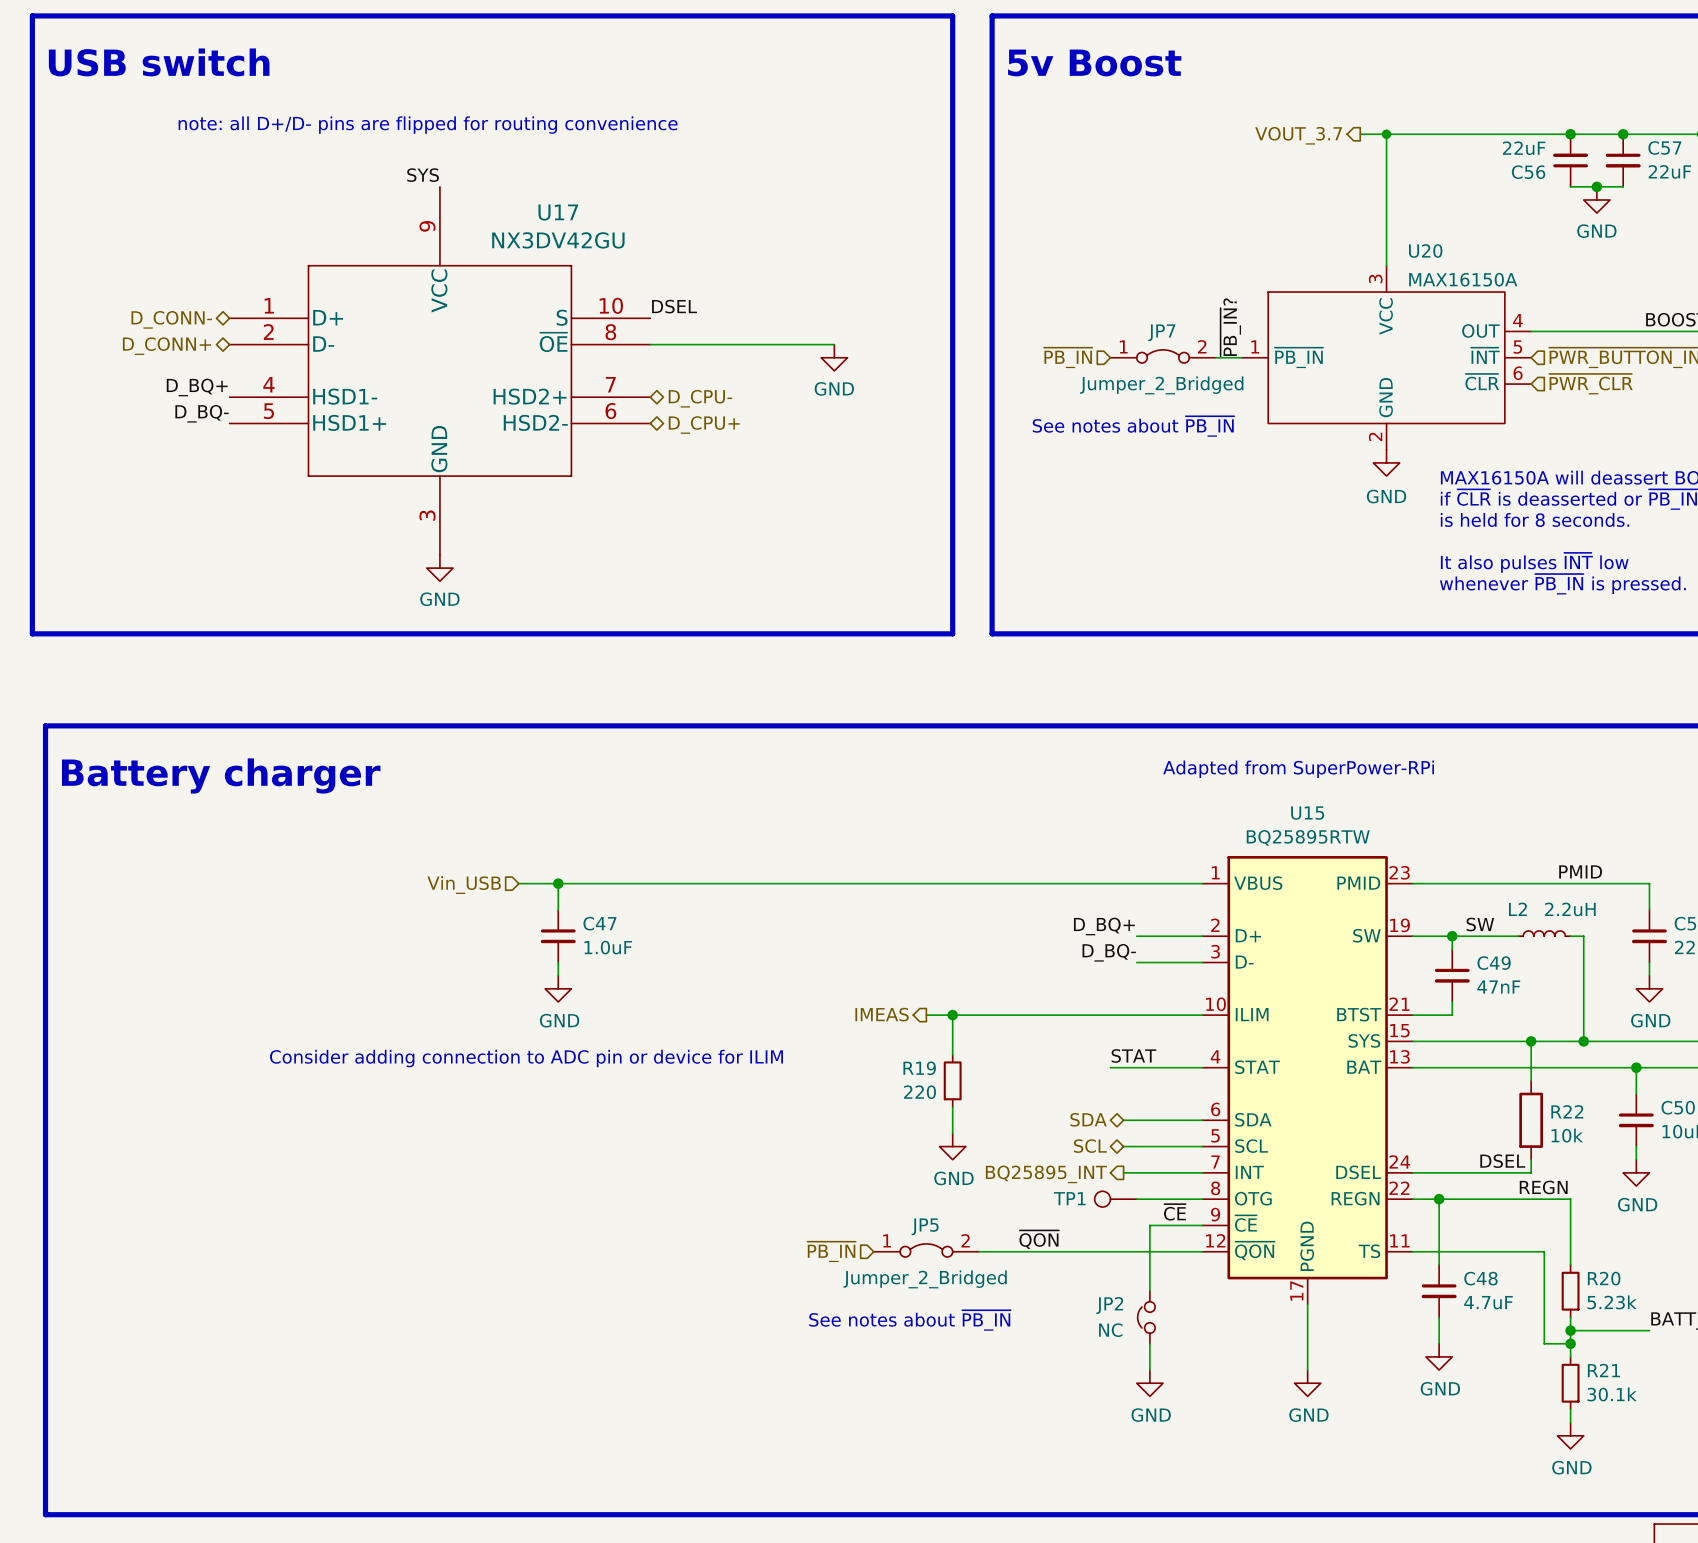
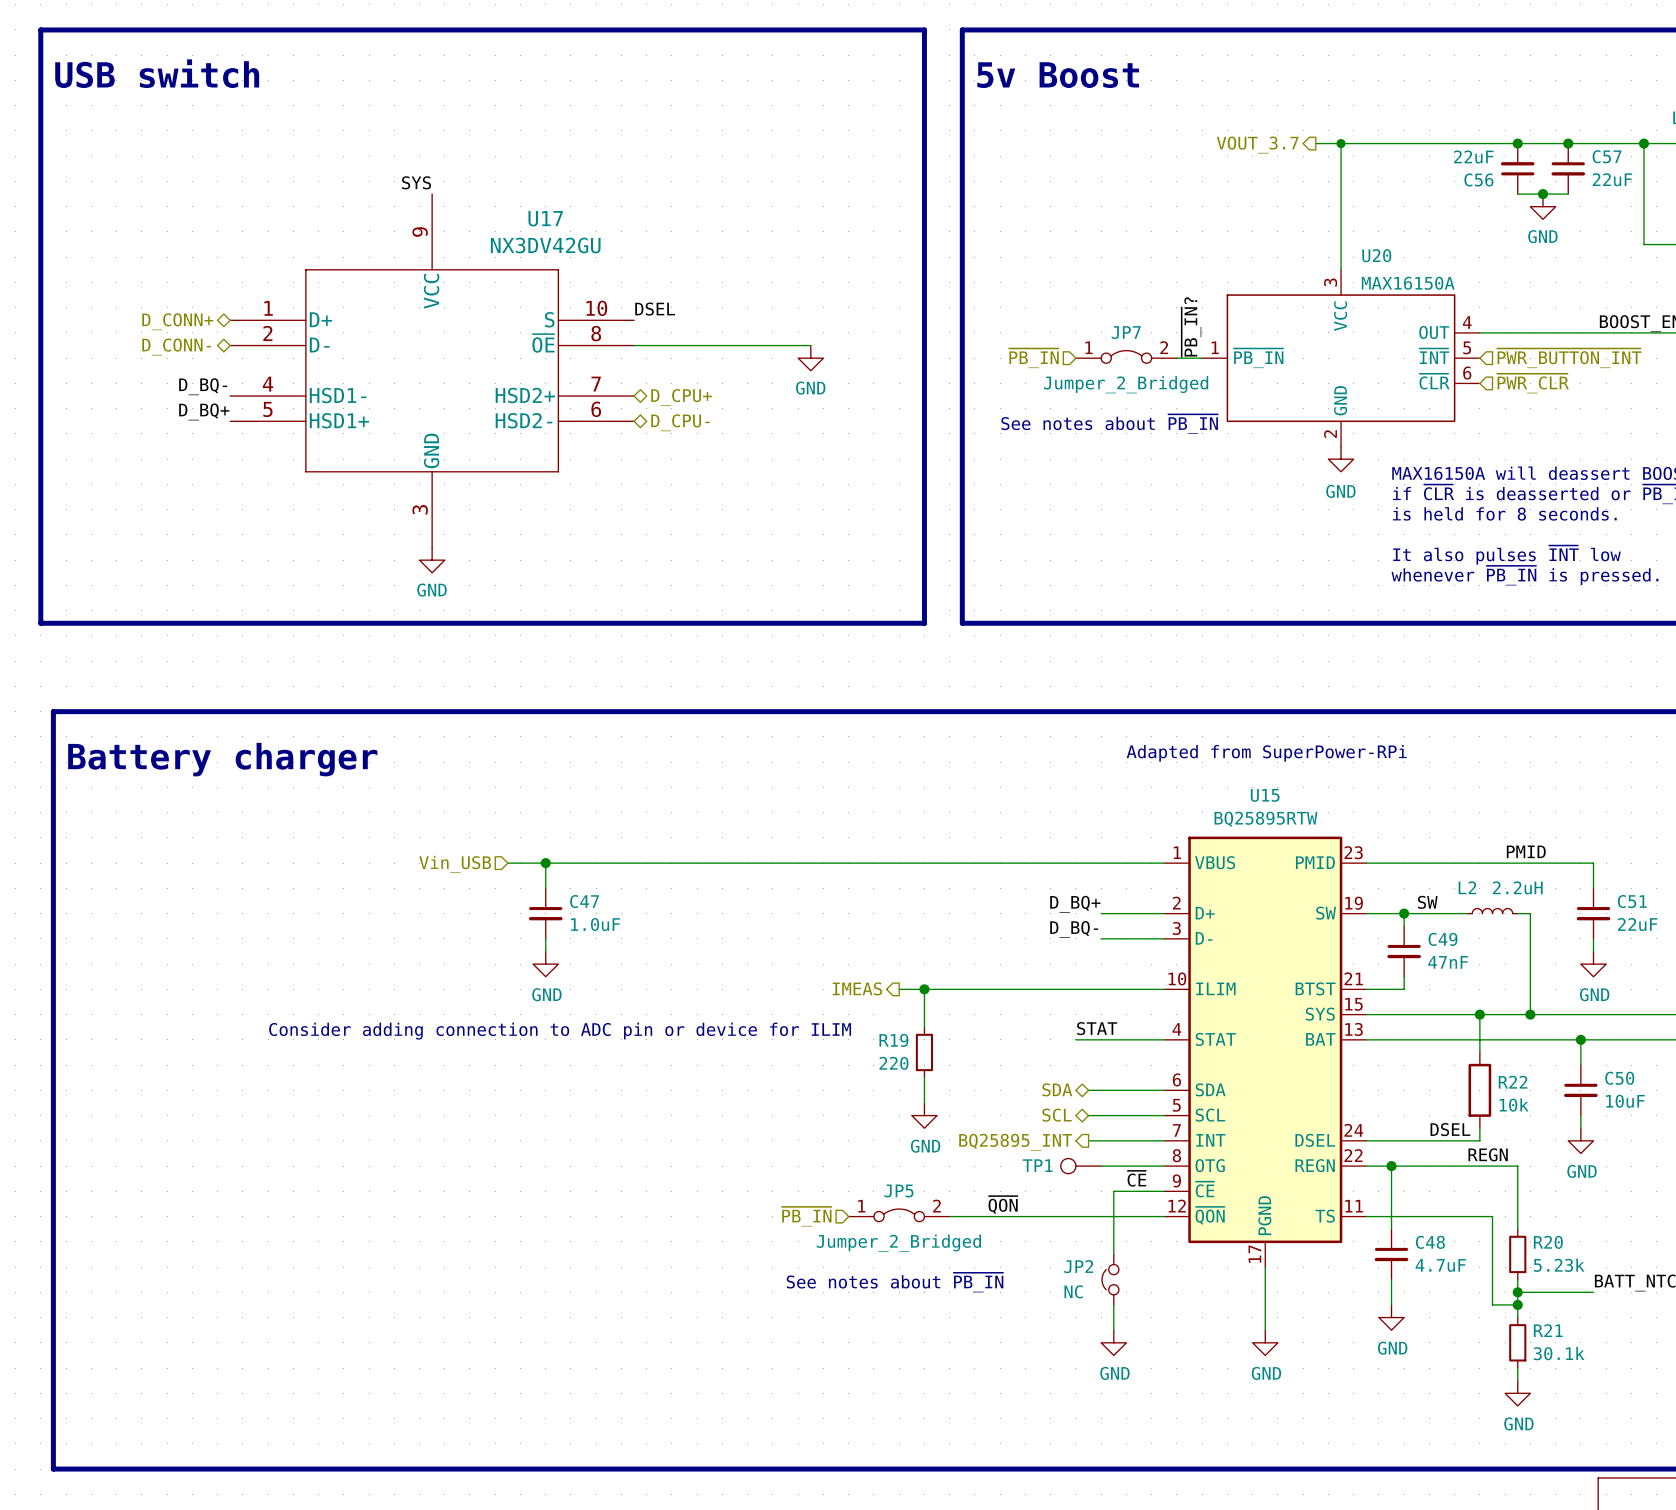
text: note: all D+/D- pins are flipped for routing convenience (428, 125) -> none
hierarchical label: D_CONN- (171, 319) -> D_CONN+ (177, 321)
hierarchical label: D_CONN+ (166, 346) -> D_CONN- (176, 347)
label: D_BQ+ (197, 387) -> D_BQ- (203, 386)
hierarchical label: D_CPU- (700, 398) -> D_CPU+ (681, 397)
label: D_BQ- (202, 413) -> D_BQ+ (204, 411)
hierarchical label: D_CPU+ (704, 425) -> D_CPU- (680, 422)

